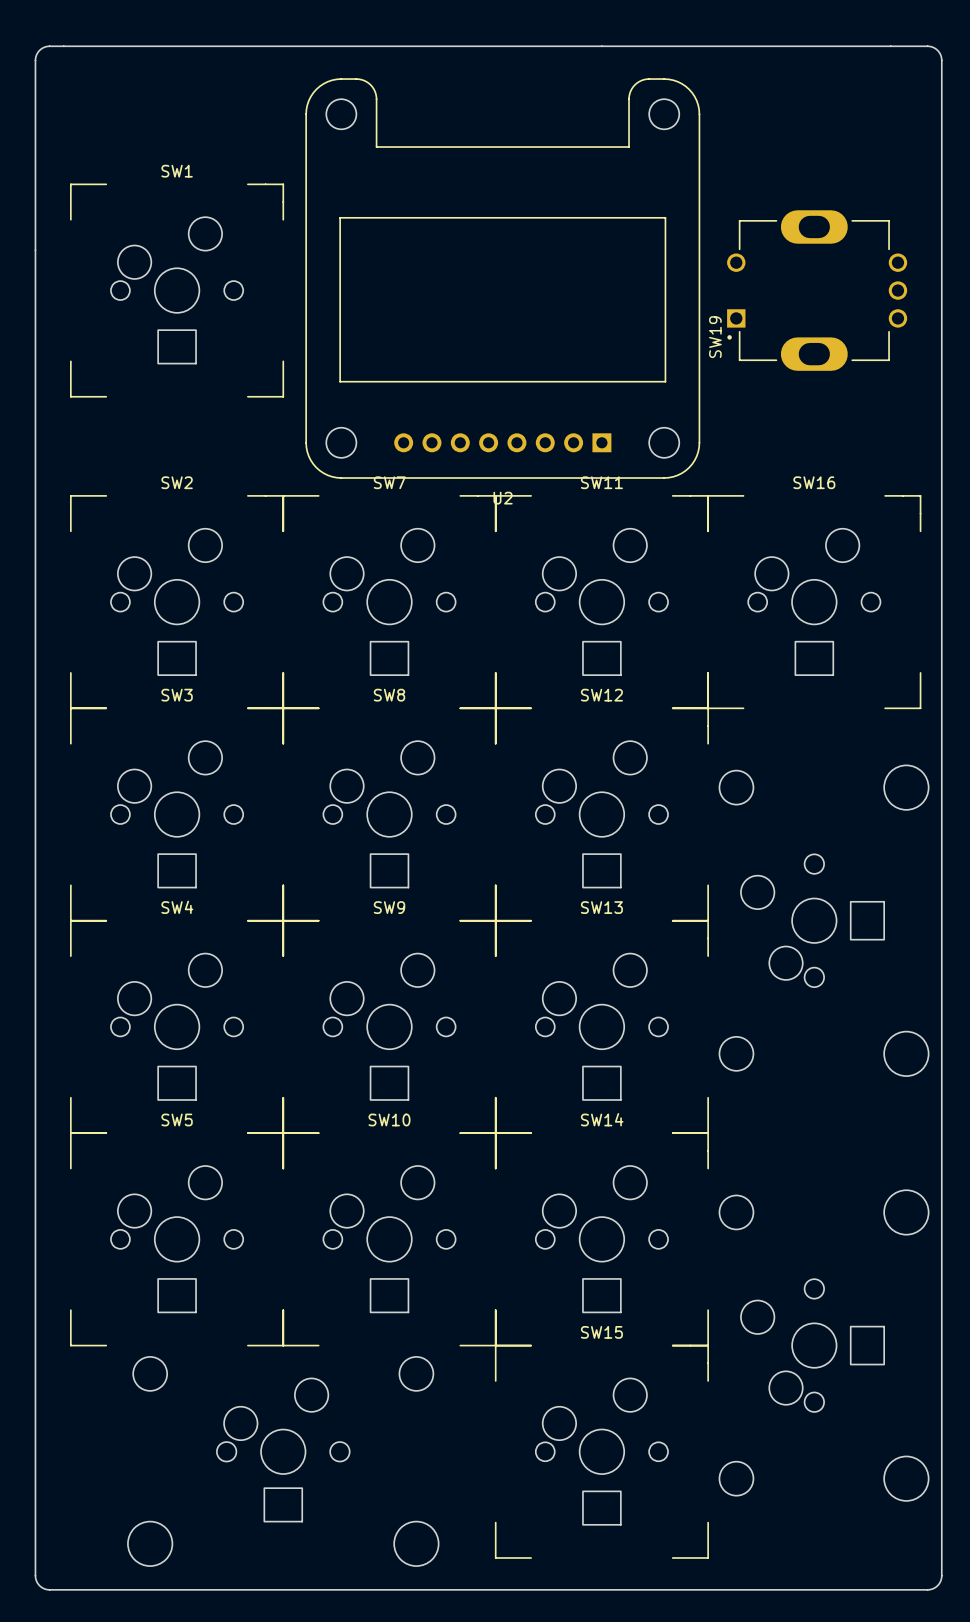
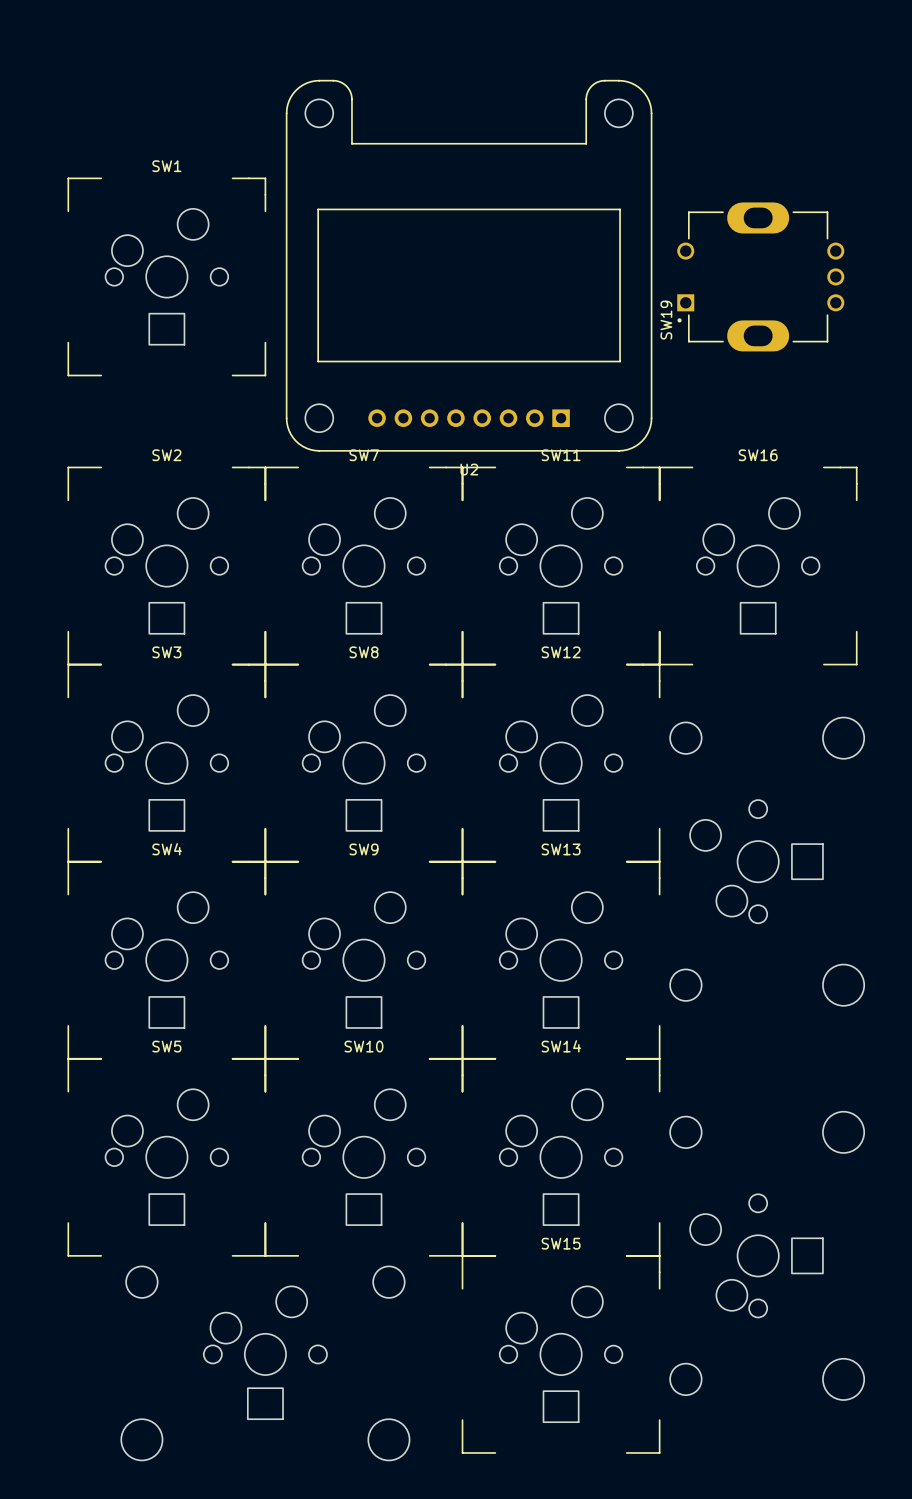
board edge: (49, 46) (927, 46) (934, 48) (939, 53) (941, 60) (941, 1575) (939, 1582) (934, 1587) (927, 1589) (49, 1589) (42, 1587) (37, 1582) (35, 1575) (35, 60) (39, 50) (49, 46) -> none

